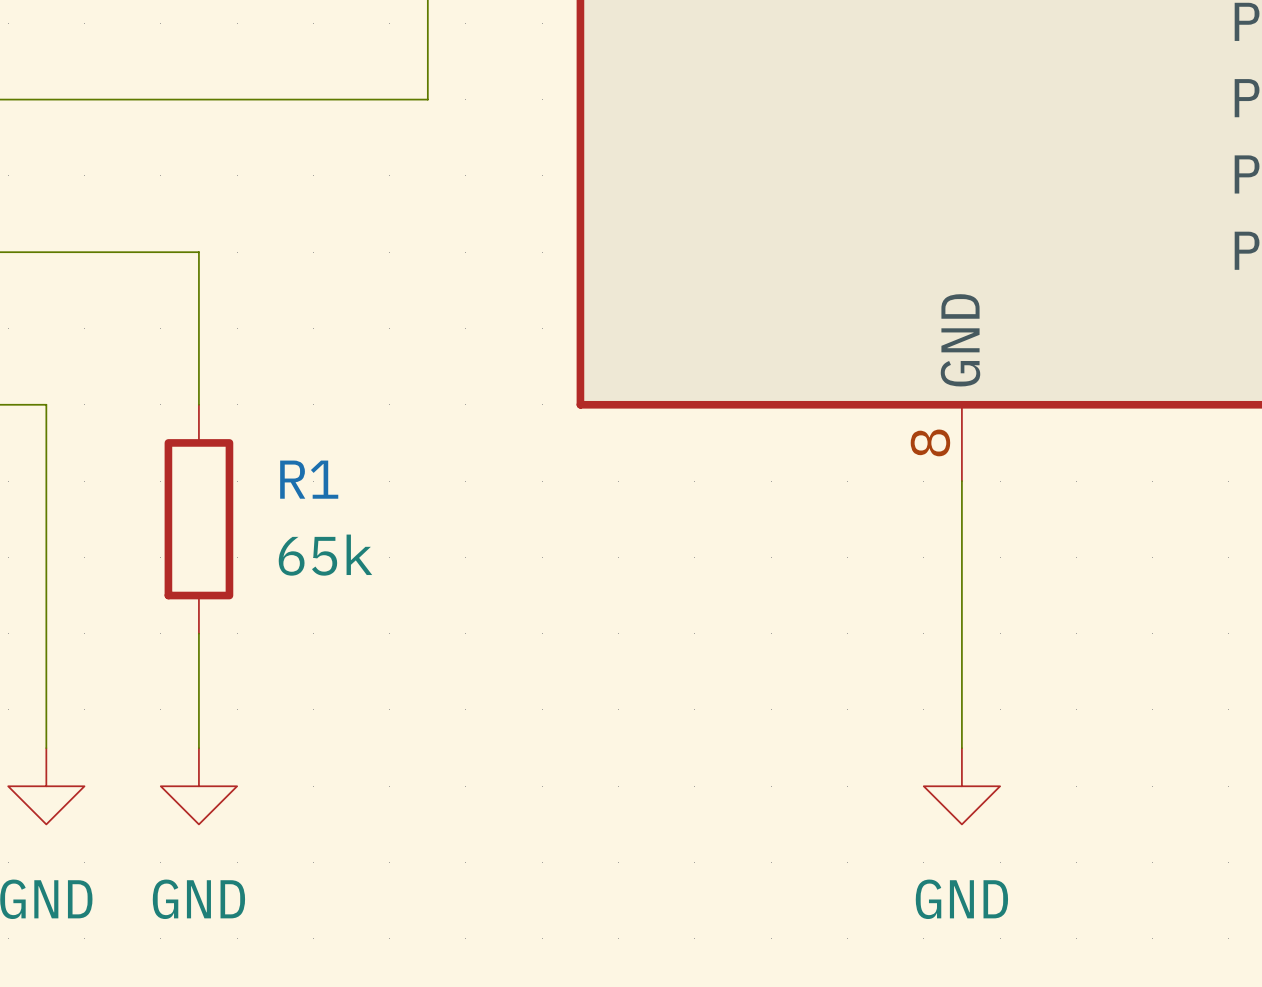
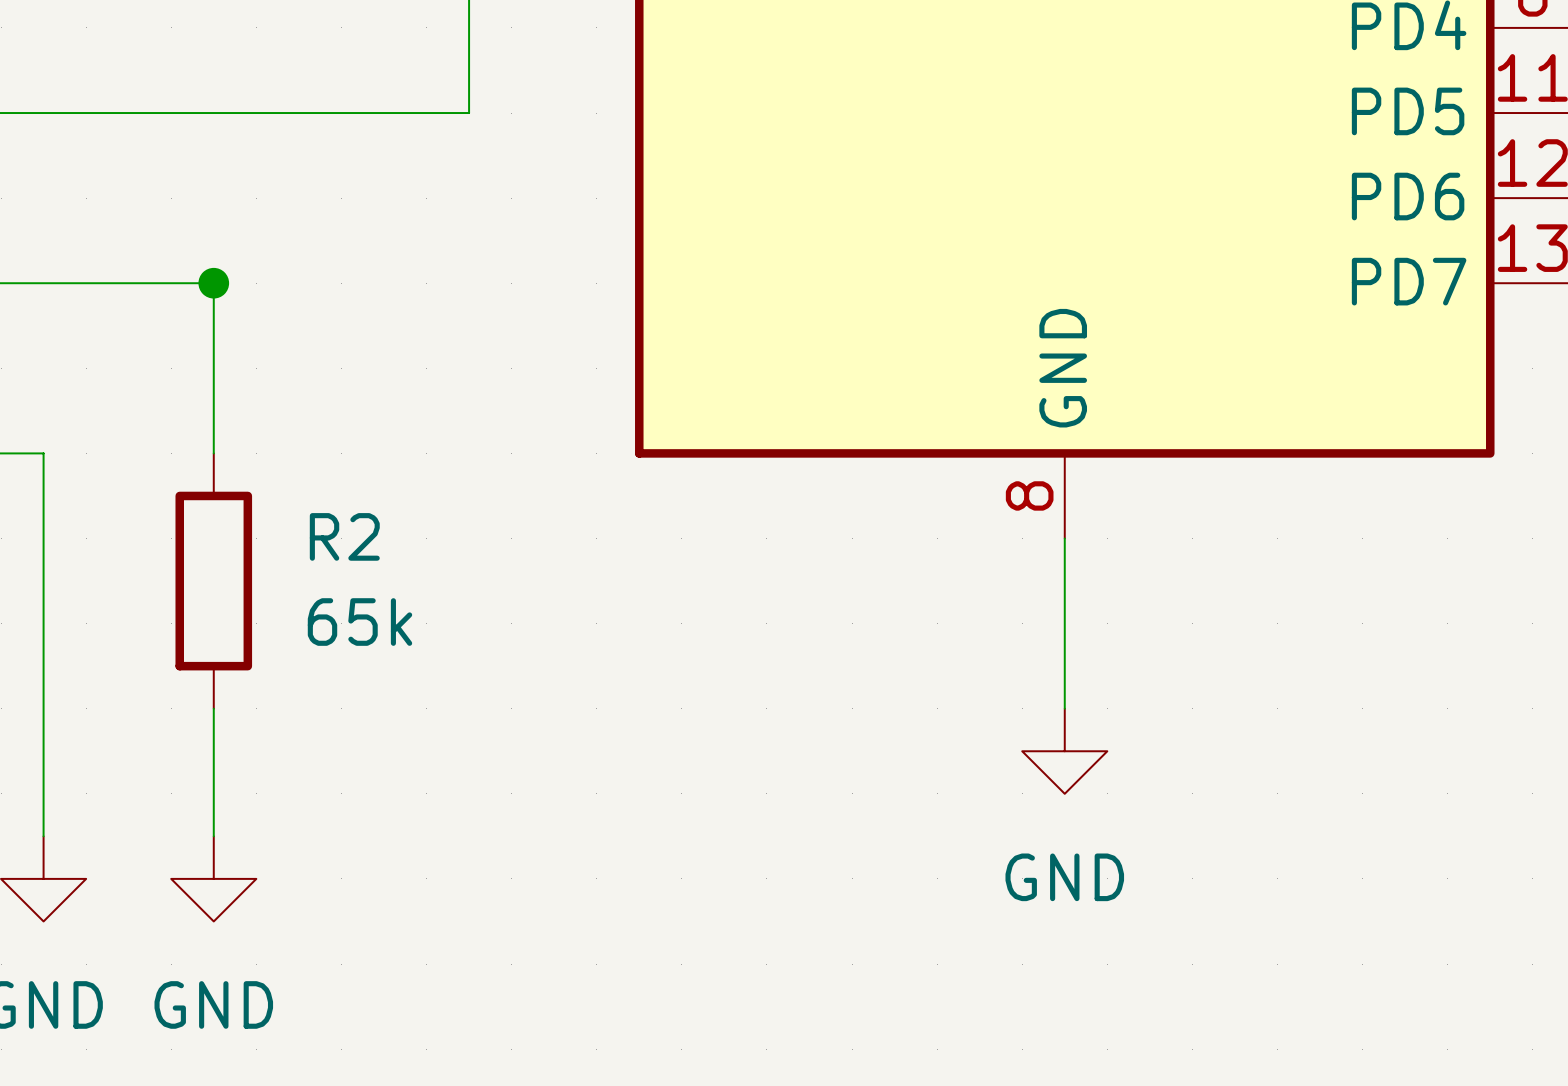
junction: none -> (213, 283)
R1 name: R1 (309, 479) -> R2 (344, 536)
wire: (961, 633) (961, 748) -> none
power symbol position: GND (961, 786) -> GND (1064, 751)

